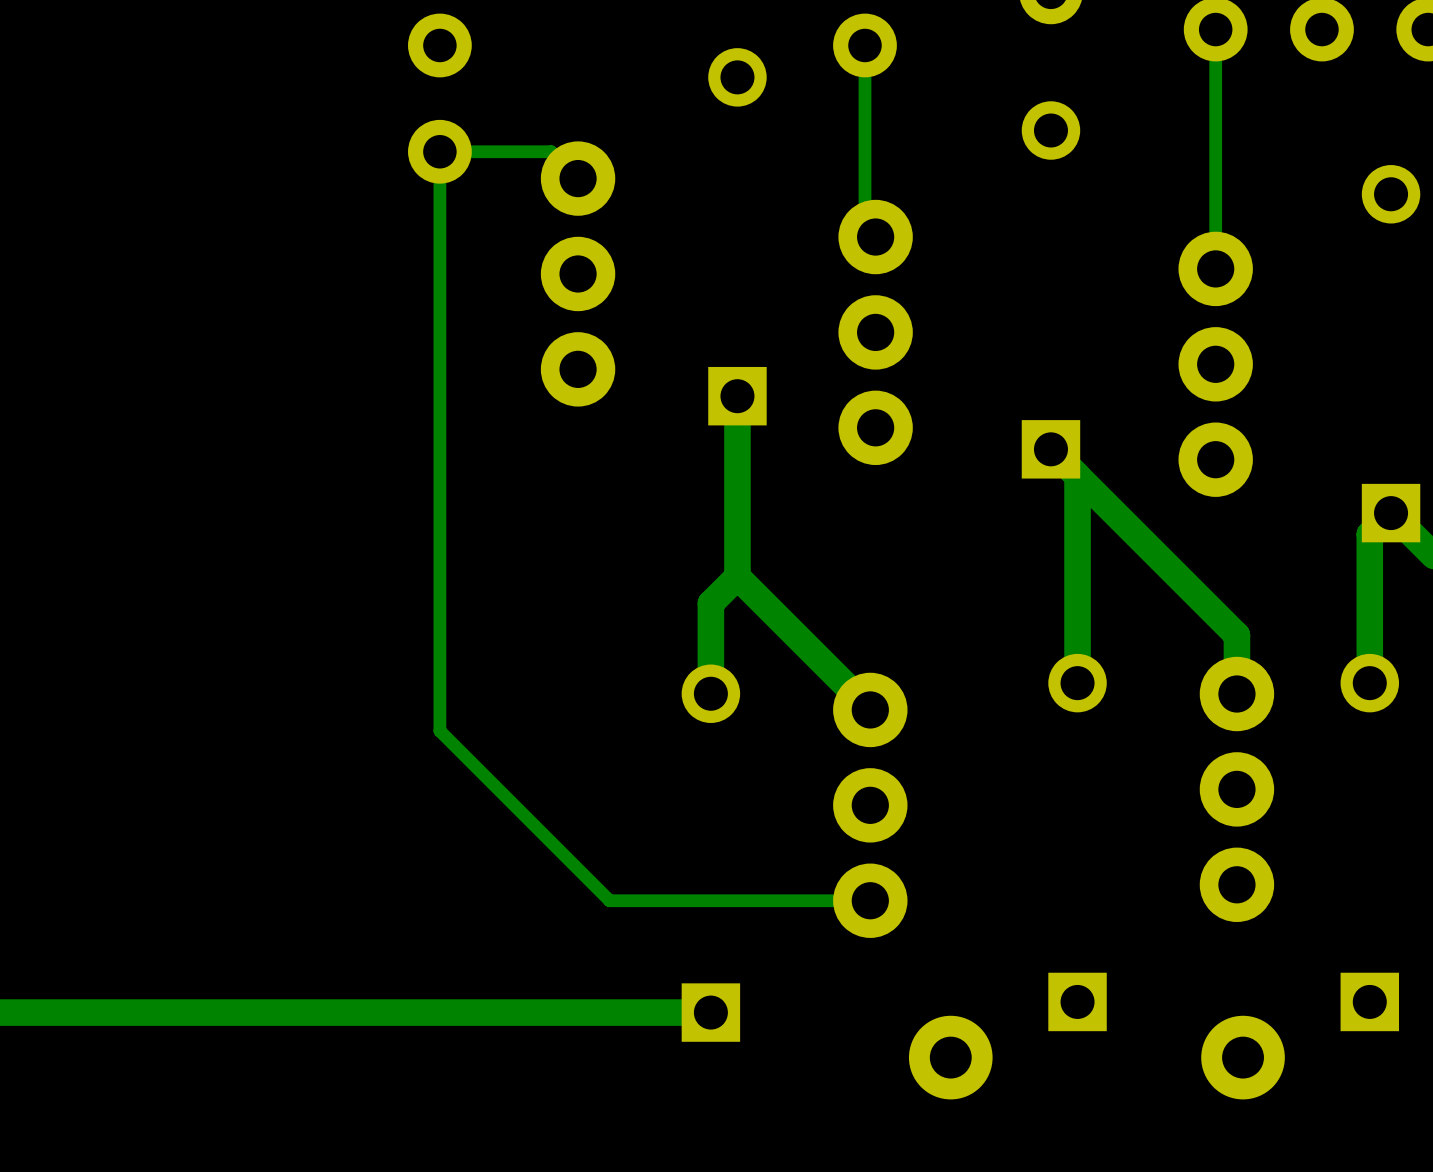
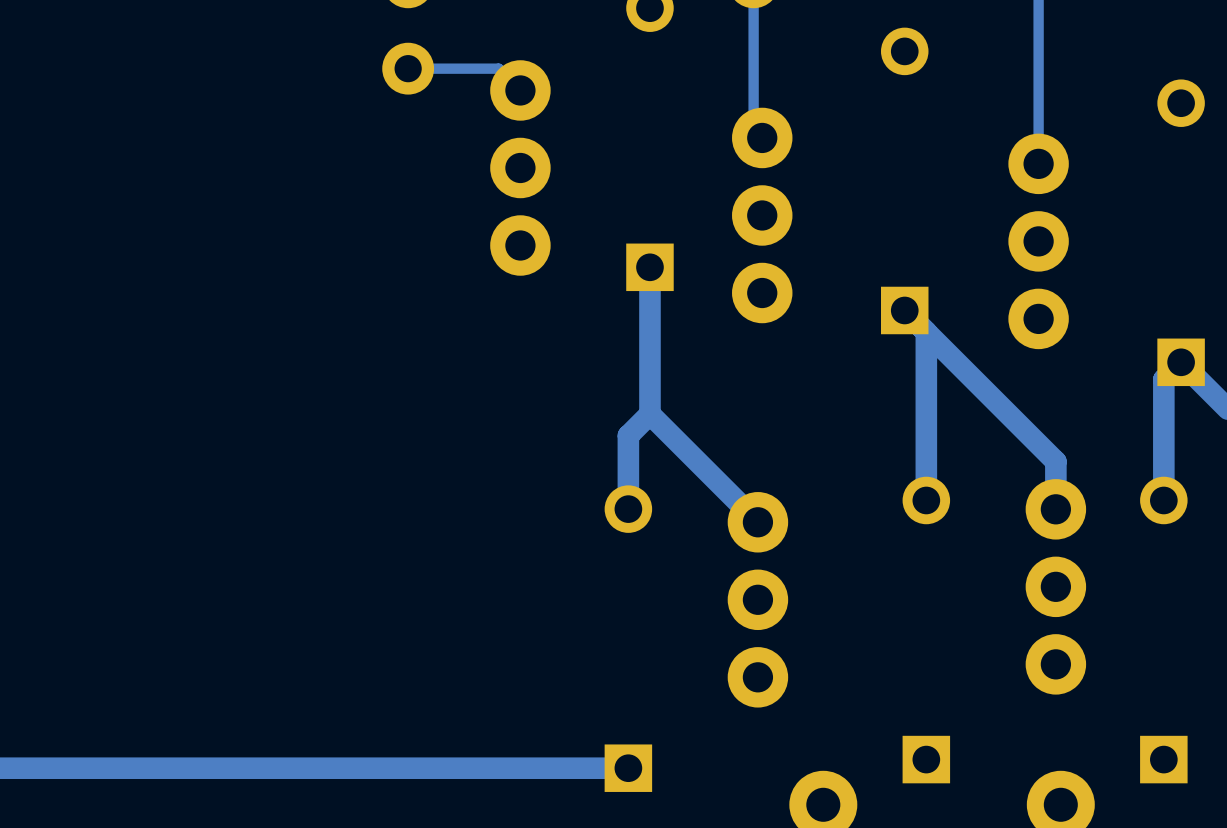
track: (439, 151) (439, 730) (609, 900) (870, 900) -> none

